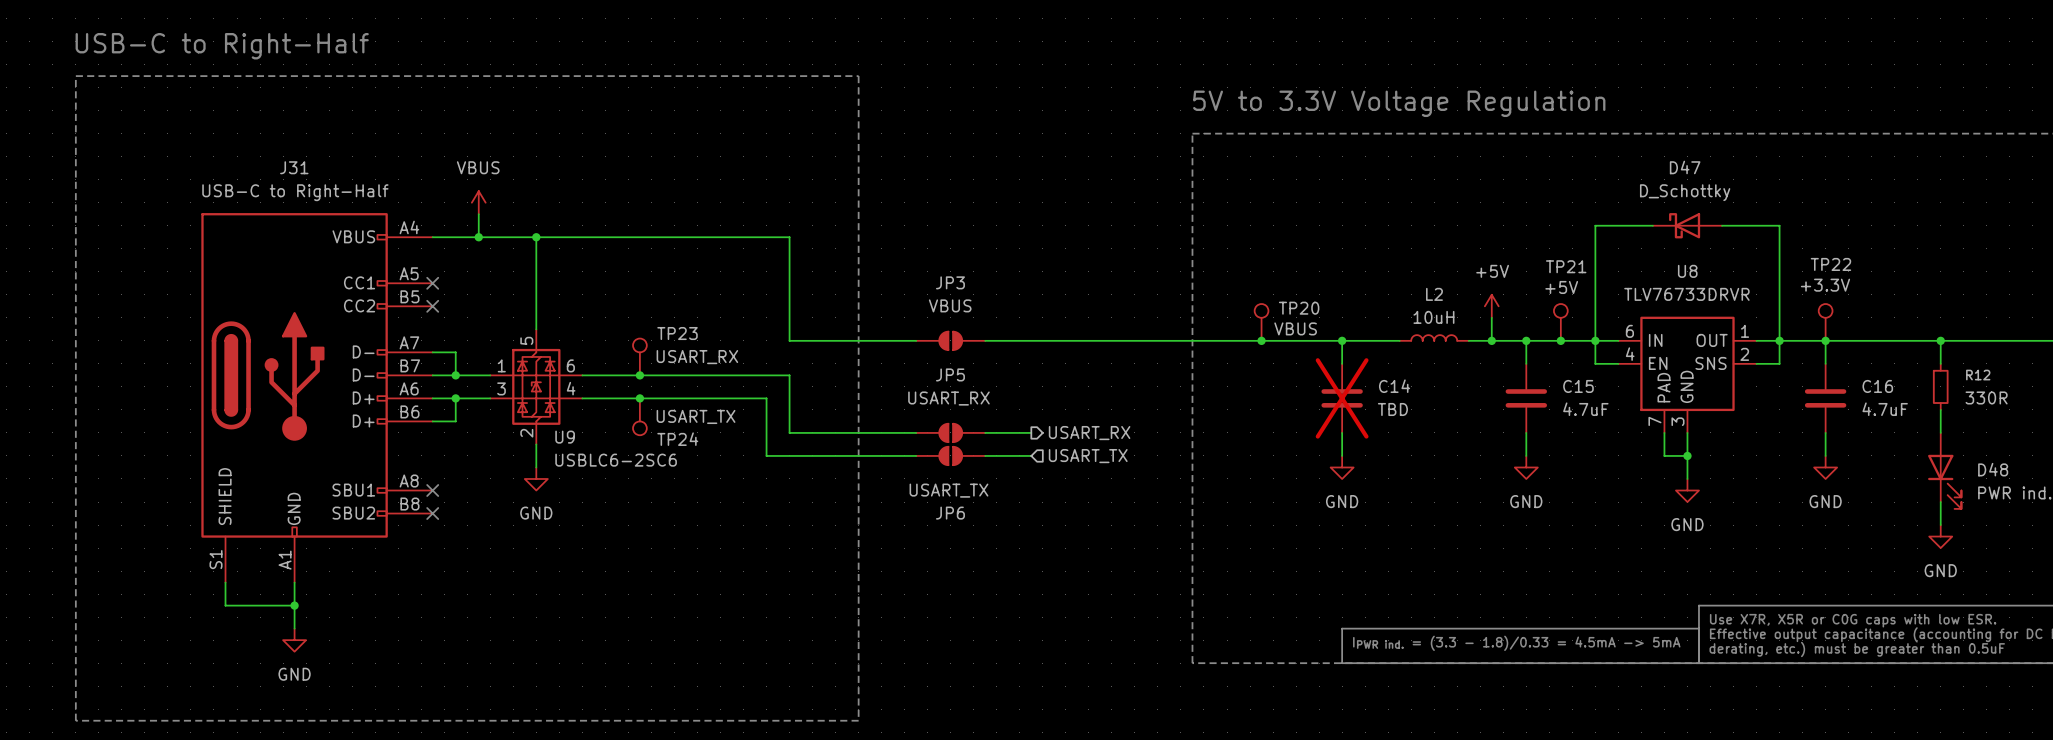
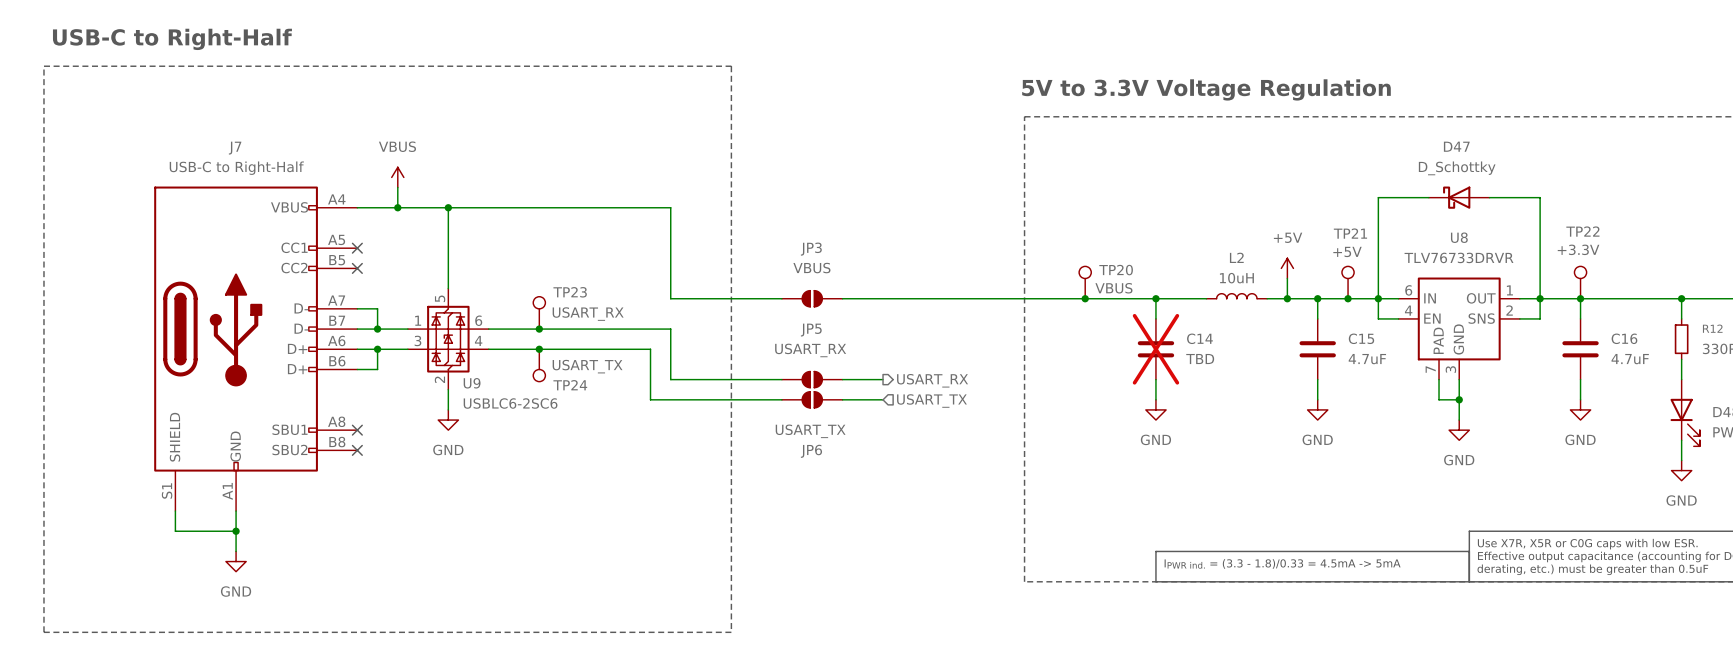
J31 name: J31 (294, 167) -> J7 (235, 148)

